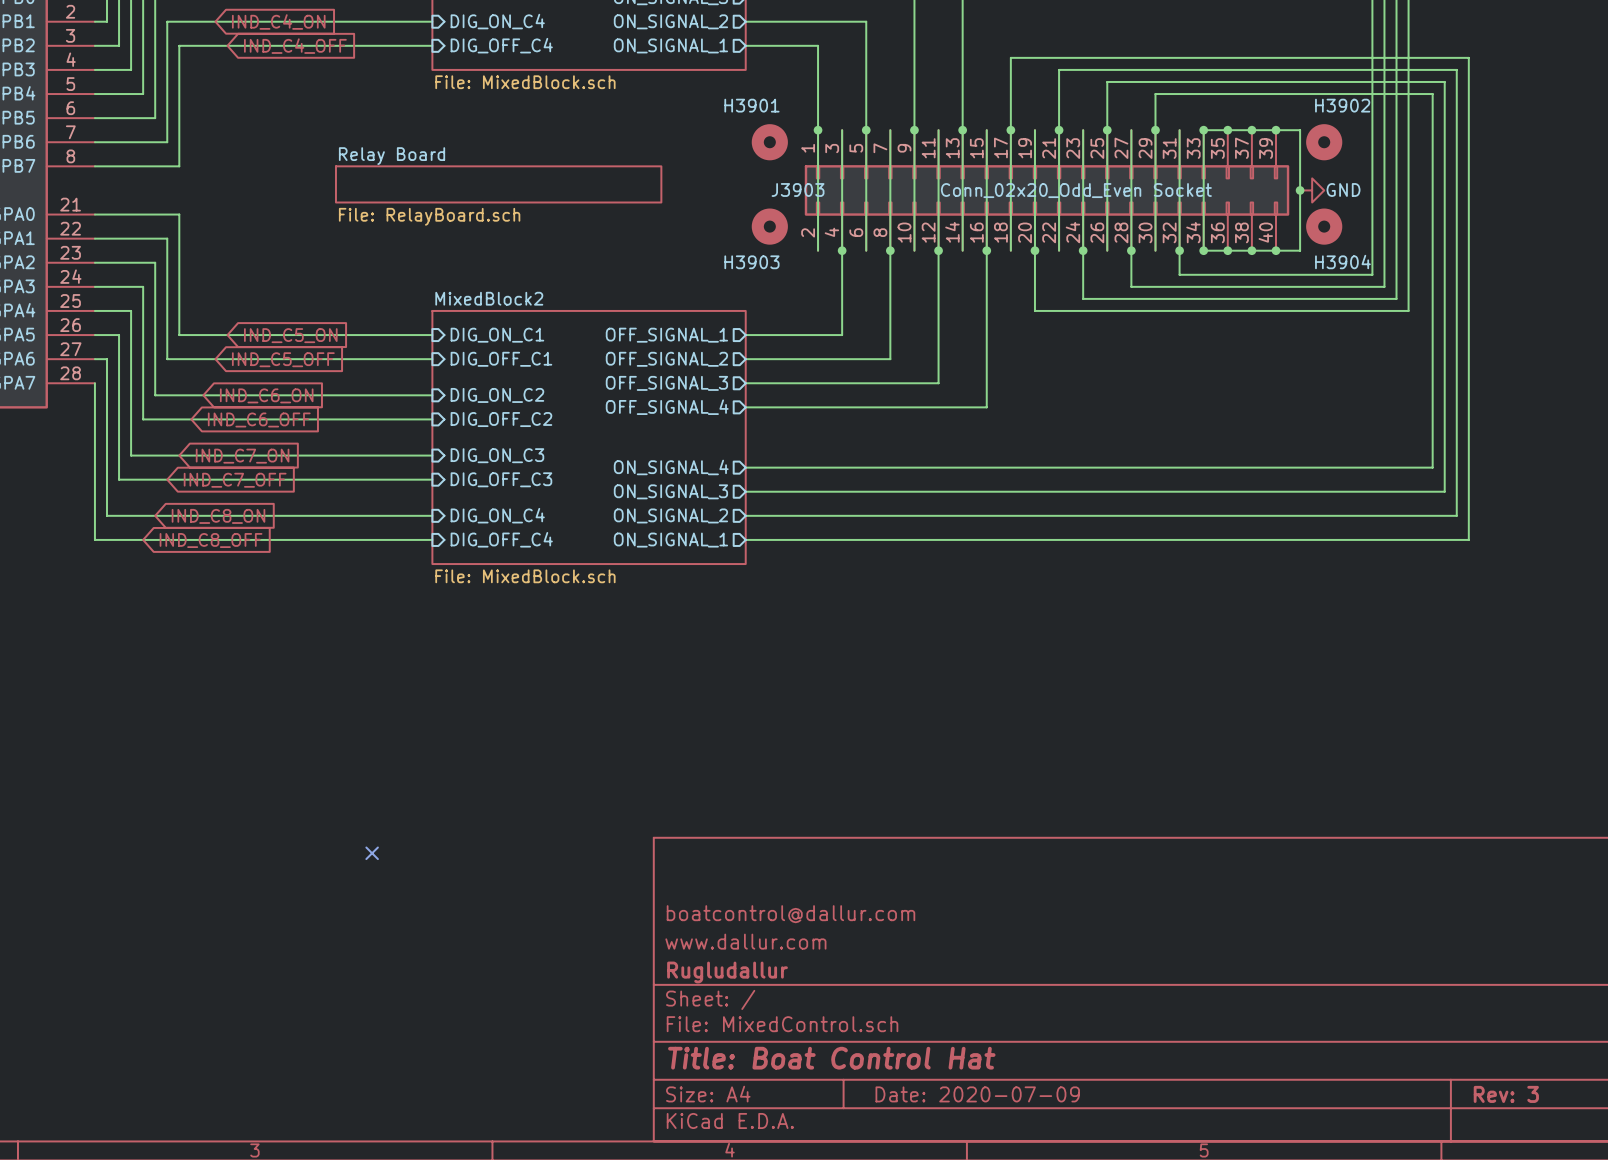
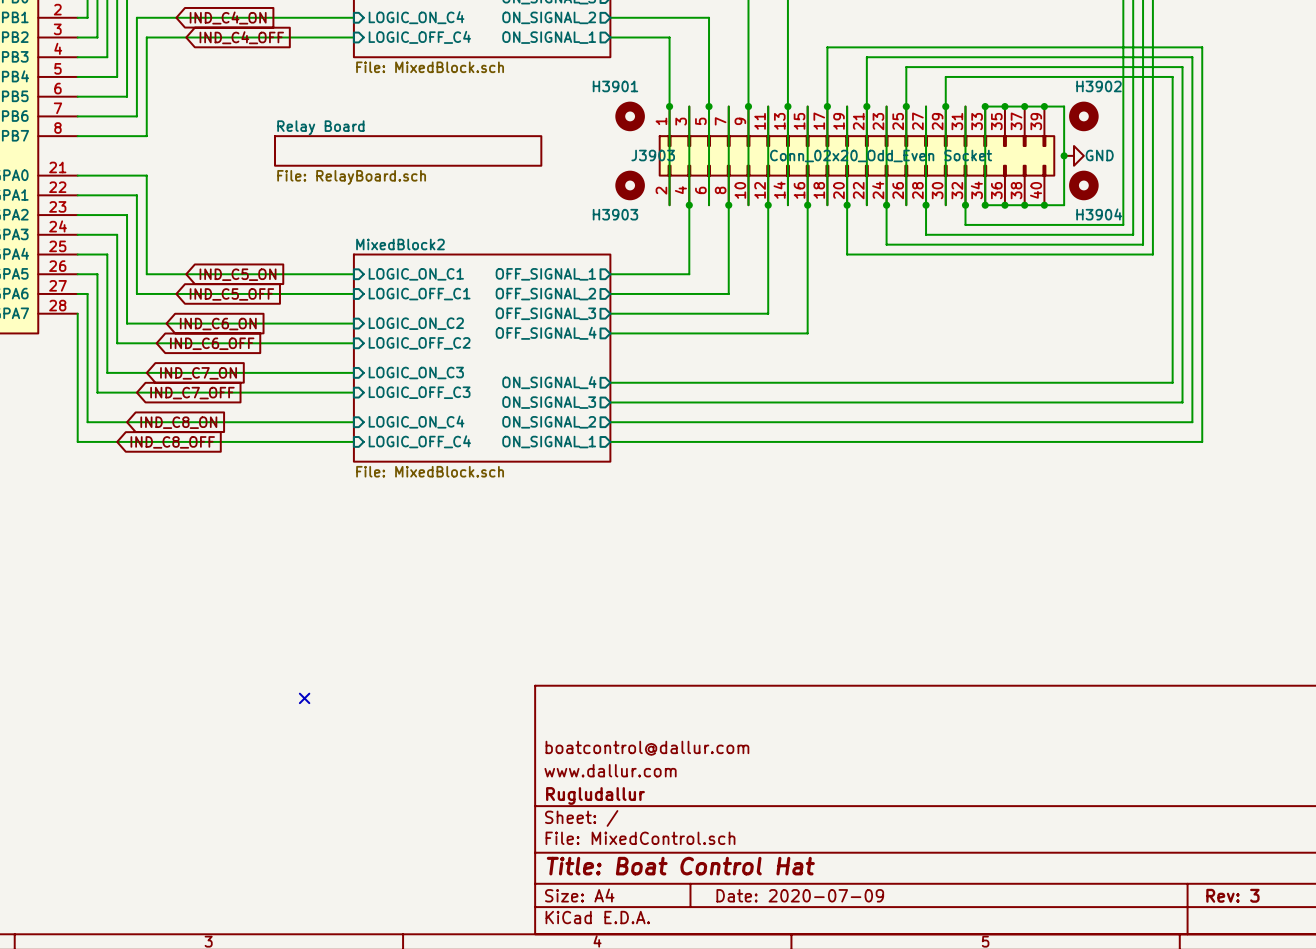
sheet pin: DIG_ON_C4 (497, 21) -> LOGIC_ON_C4 (416, 17)
sheet pin: DIG_OFF_C4 (501, 45) -> LOGIC_OFF_C4 (419, 37)
sheet pin: DIG_ON_C1 (497, 335) -> LOGIC_ON_C1 (416, 274)
sheet pin: DIG_OFF_C1 (501, 359) -> LOGIC_OFF_C1 (419, 294)
sheet pin: DIG_ON_C2 (497, 395) -> LOGIC_ON_C2 (416, 323)
sheet pin: DIG_OFF_C2 (501, 419) -> LOGIC_OFF_C2 (419, 343)
sheet pin: DIG_ON_C3 (497, 455) -> LOGIC_ON_C3 (416, 372)
sheet pin: DIG_OFF_C3 (501, 479) -> LOGIC_OFF_C3 (419, 392)
sheet pin: DIG_ON_C4 (497, 515) -> LOGIC_ON_C4 (416, 422)
sheet pin: DIG_OFF_C4 (501, 539) -> LOGIC_OFF_C4 (419, 441)

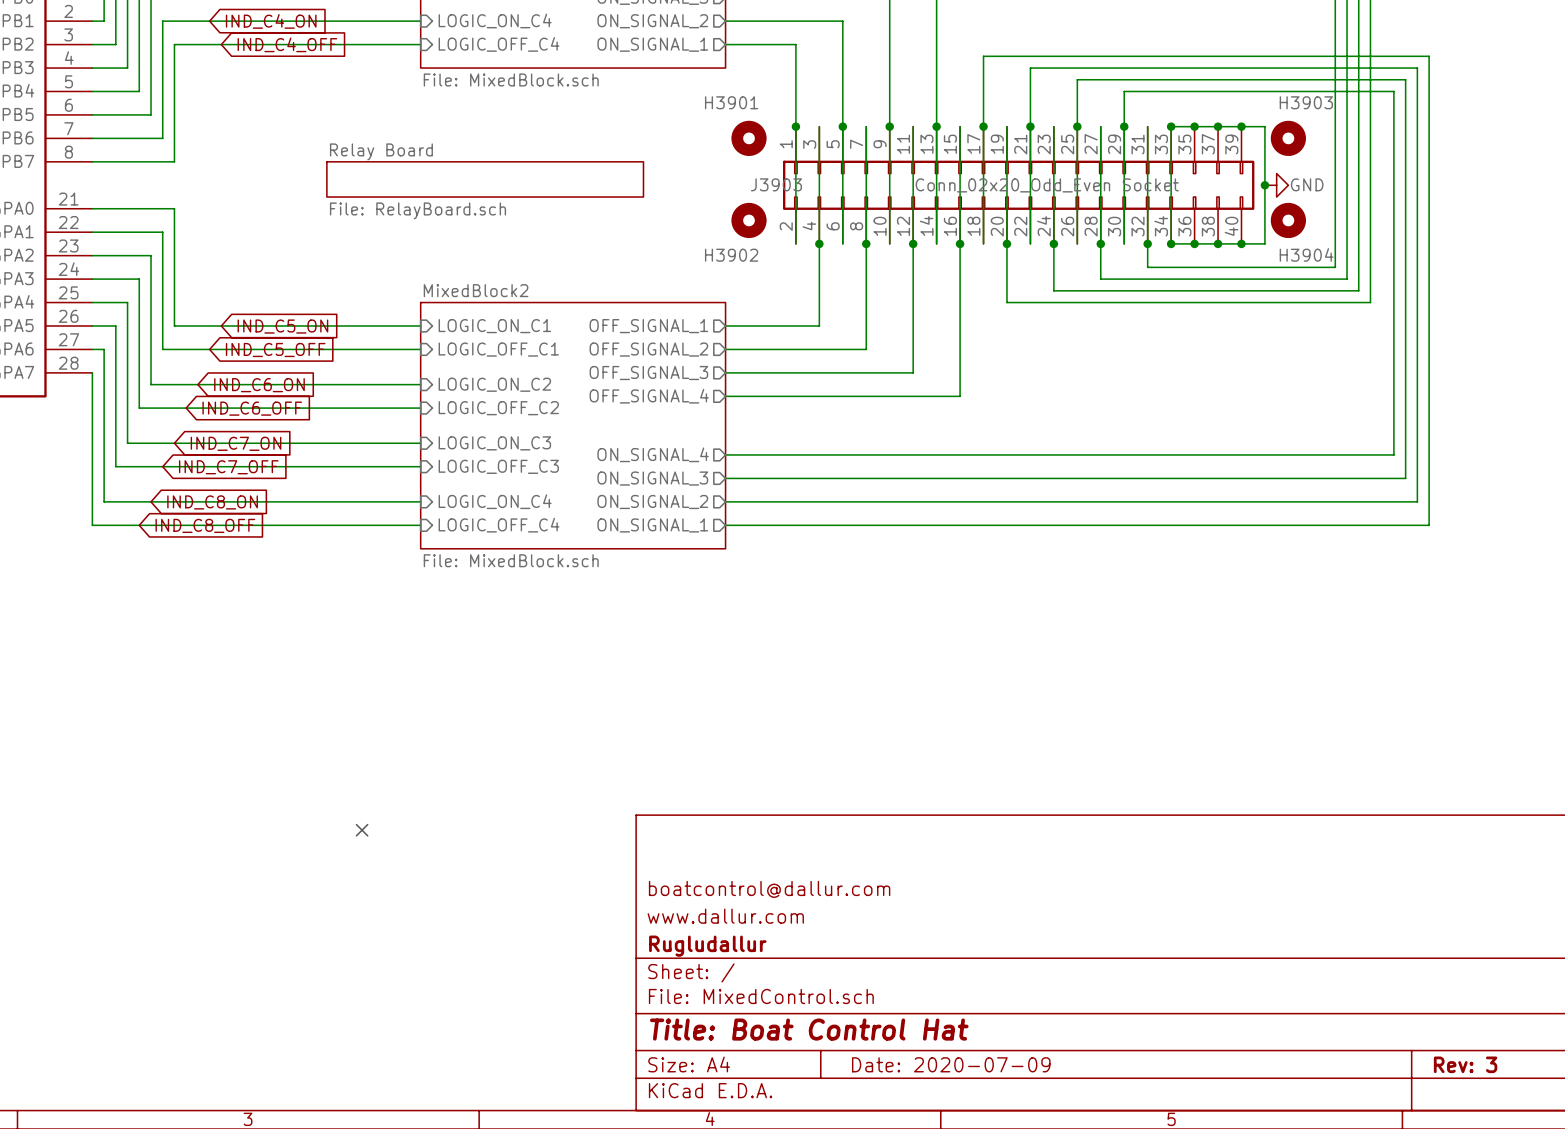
H3902 name: H3902 (1098, 86) -> H3903 (1306, 102)
H3903 name: H3903 (615, 214) -> H3902 (731, 255)

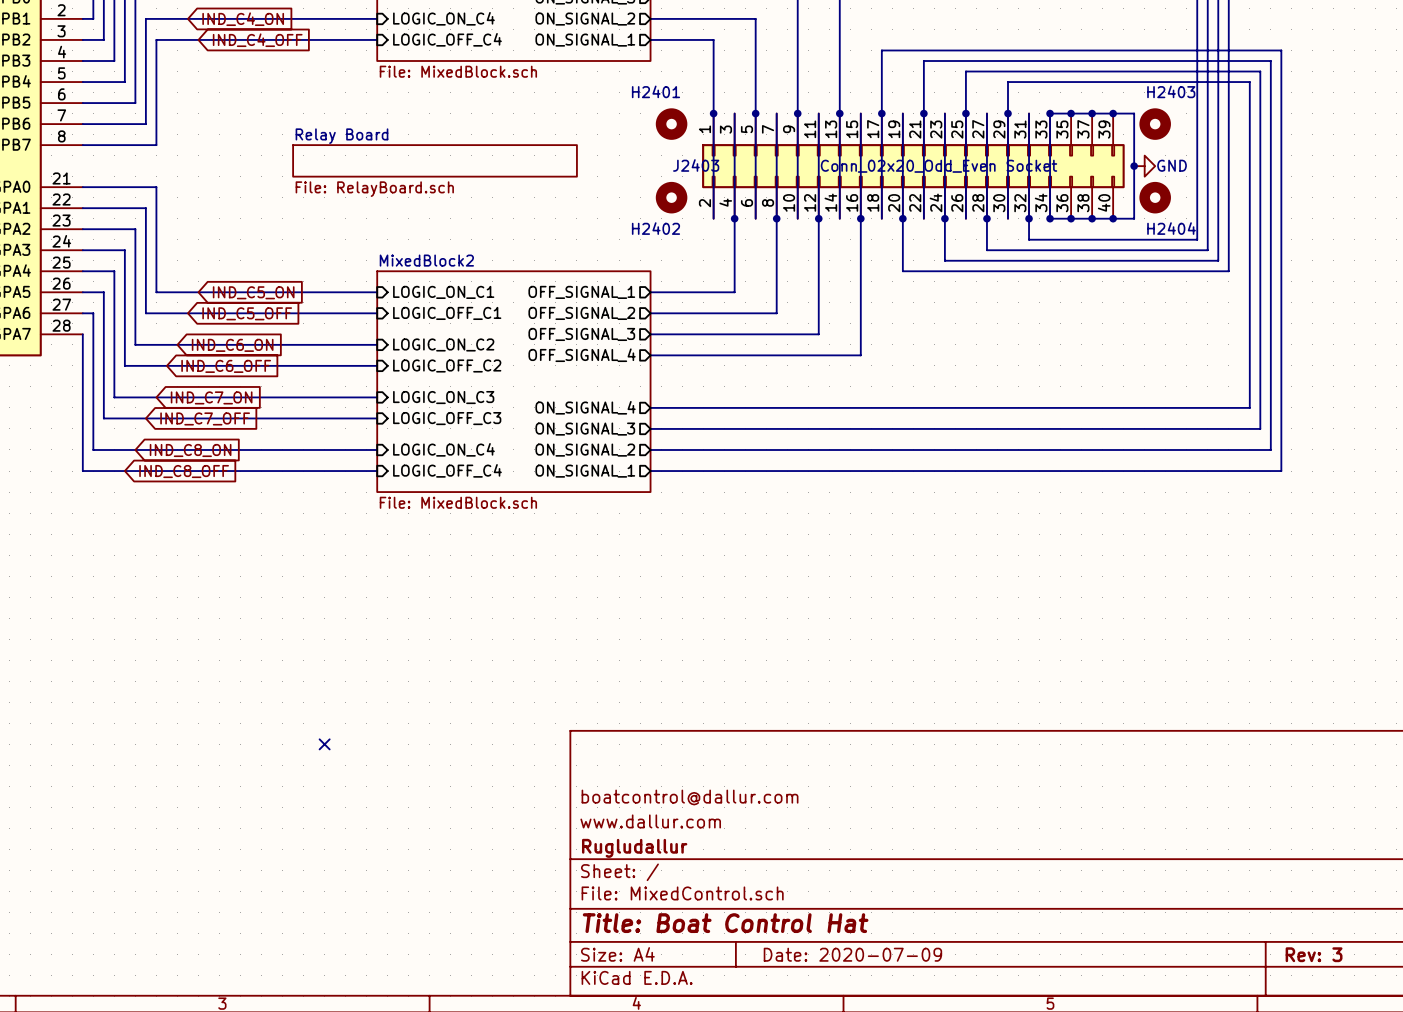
H3901 name: H3901 (731, 102) -> H2401 (655, 91)
H3903 name: H3903 (1306, 102) -> H2403 (1171, 91)
J3903 name: J3903 (776, 184) -> J2403 (696, 165)
H3904 name: H3904 (1306, 254) -> H2404 (1171, 228)
H3902 name: H3902 (731, 255) -> H2402 (655, 228)

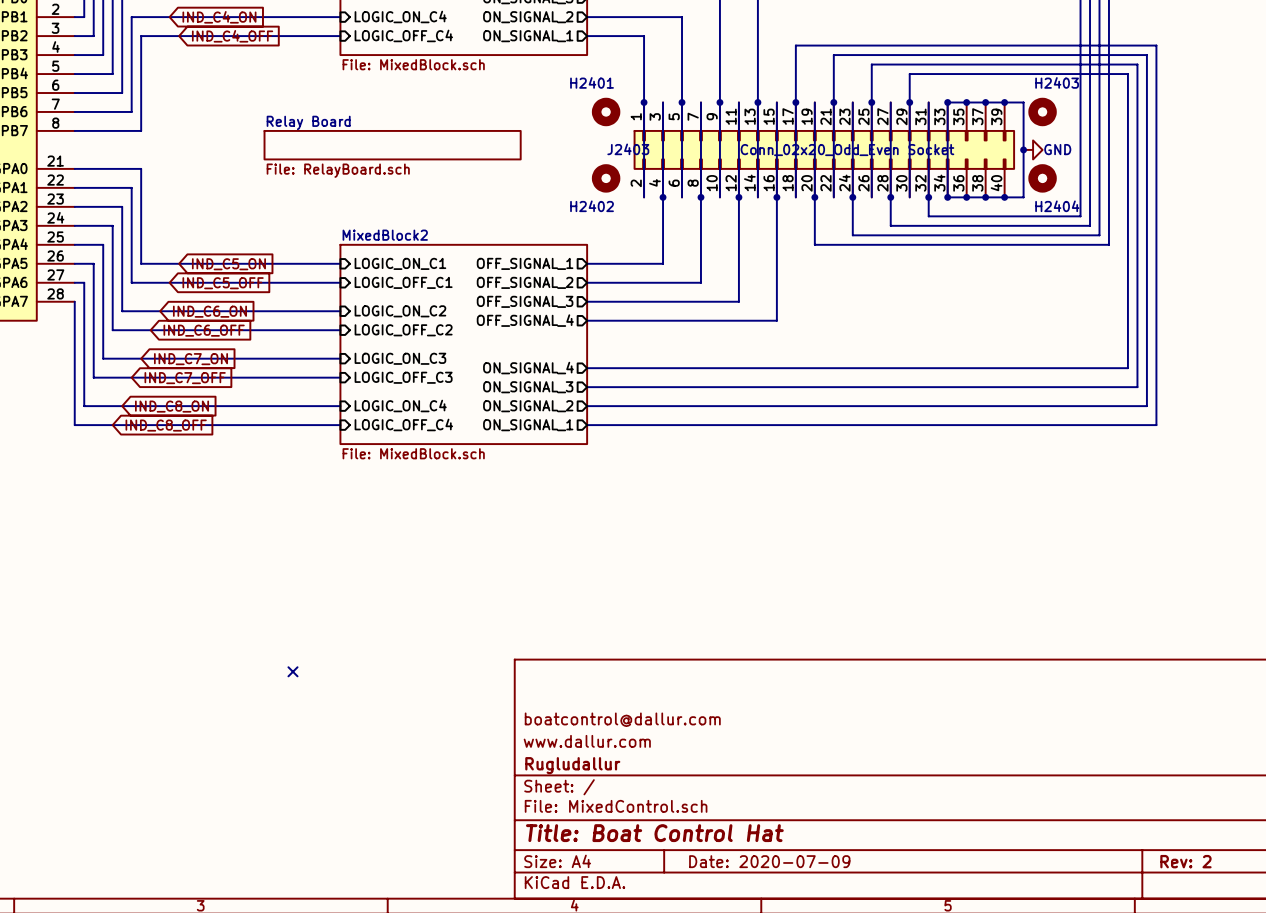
title block: Rev: 3 (1314, 954) -> Rev: 2 (1185, 861)

